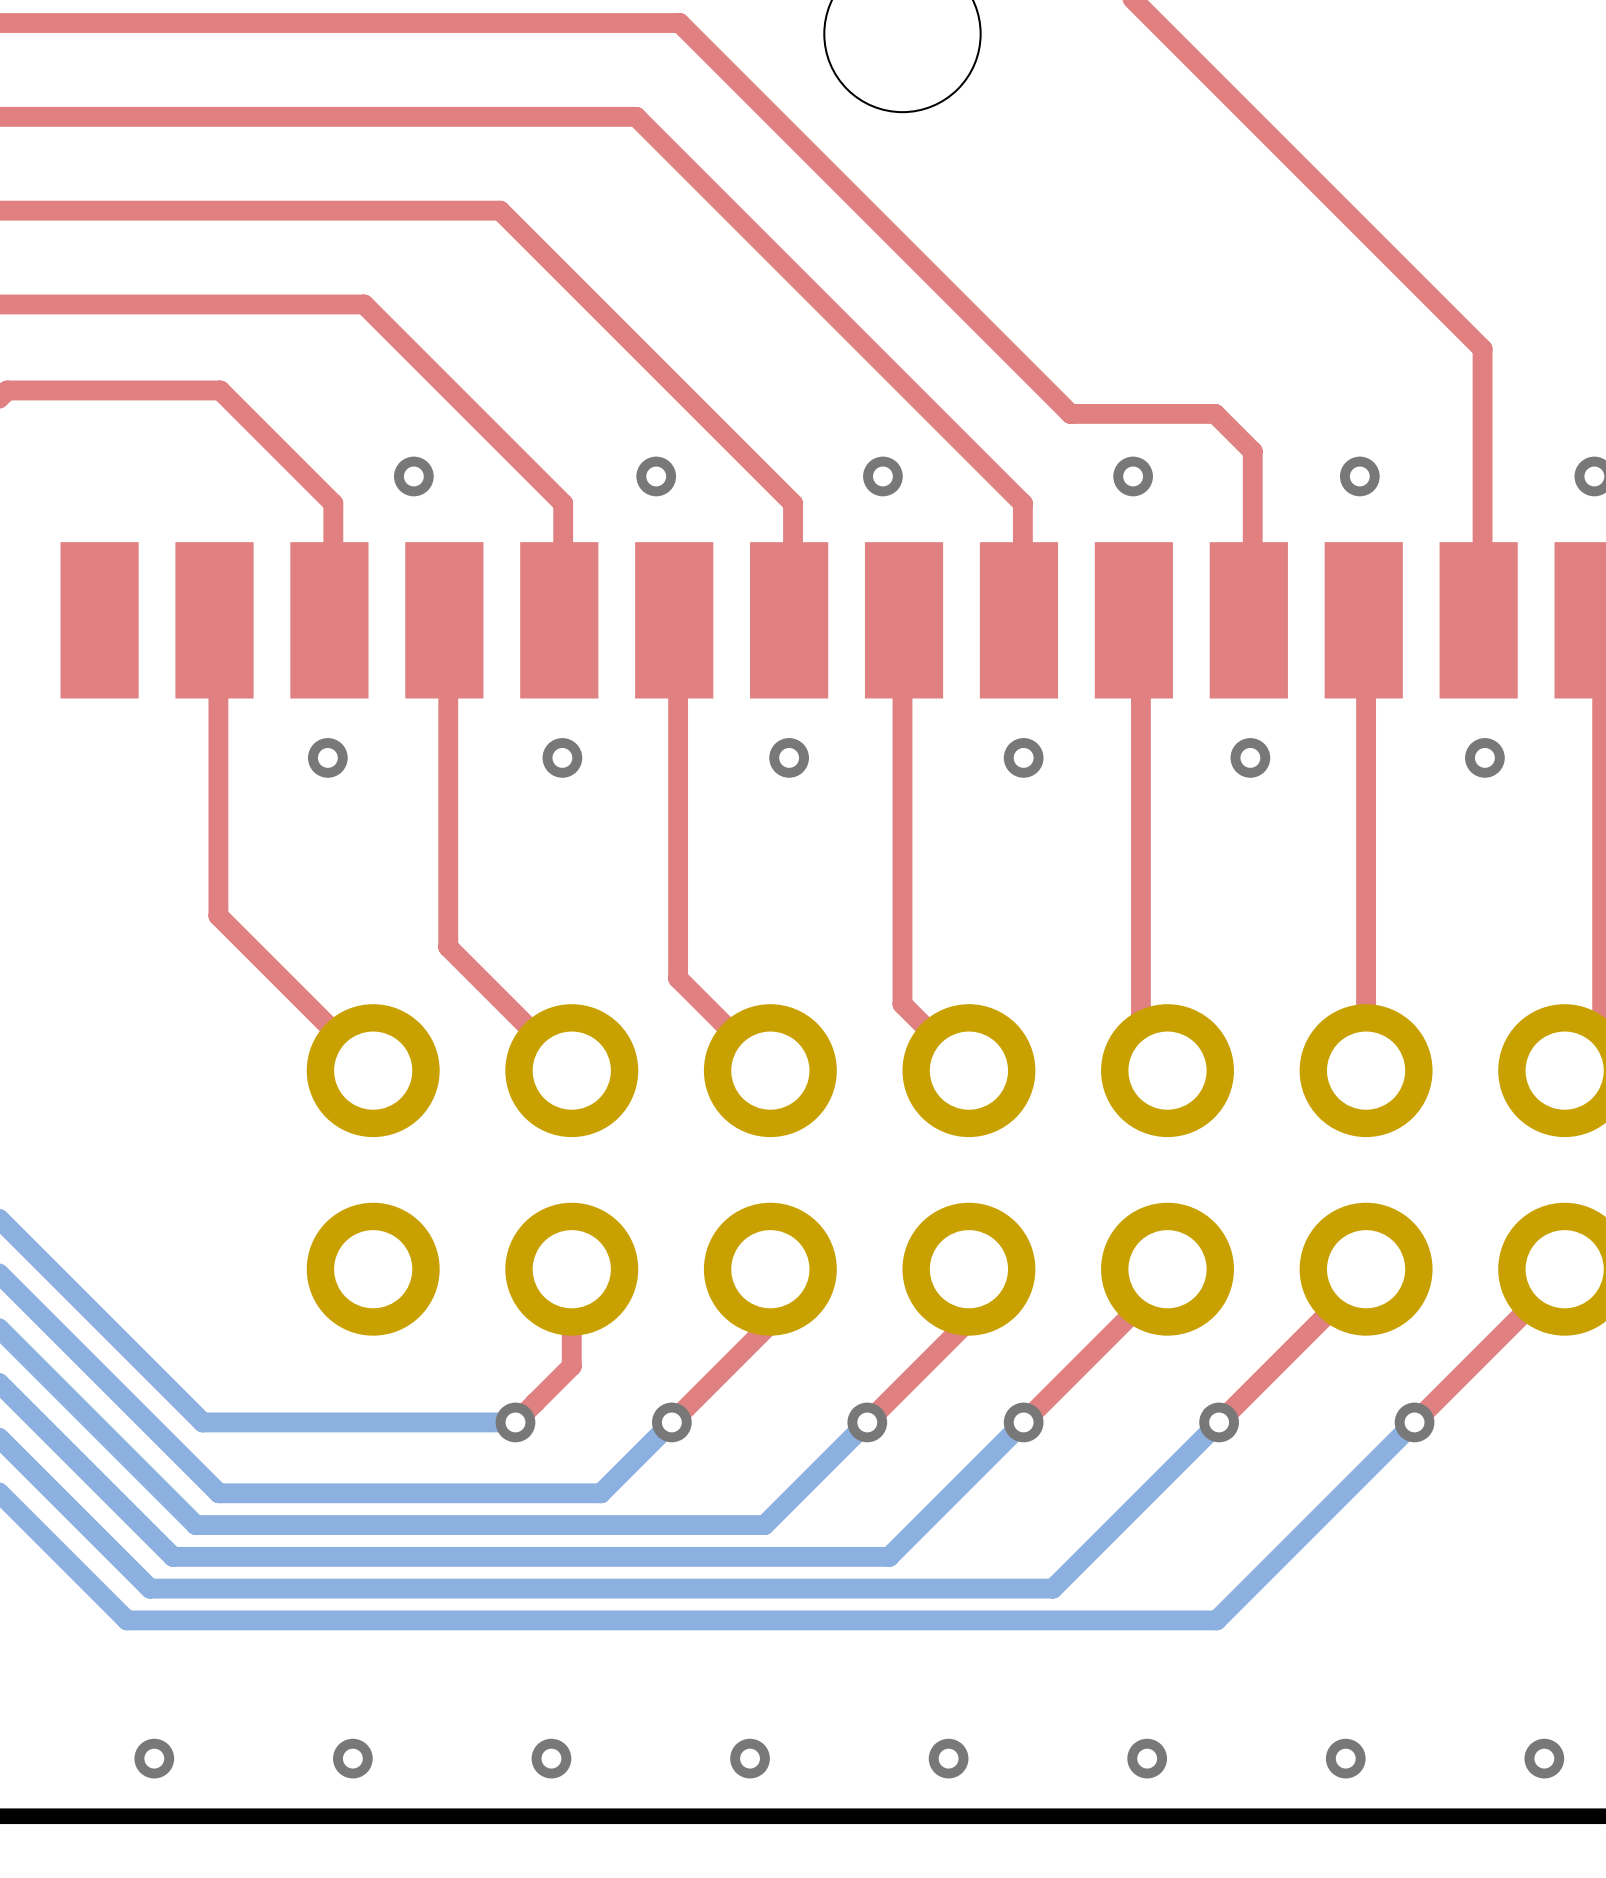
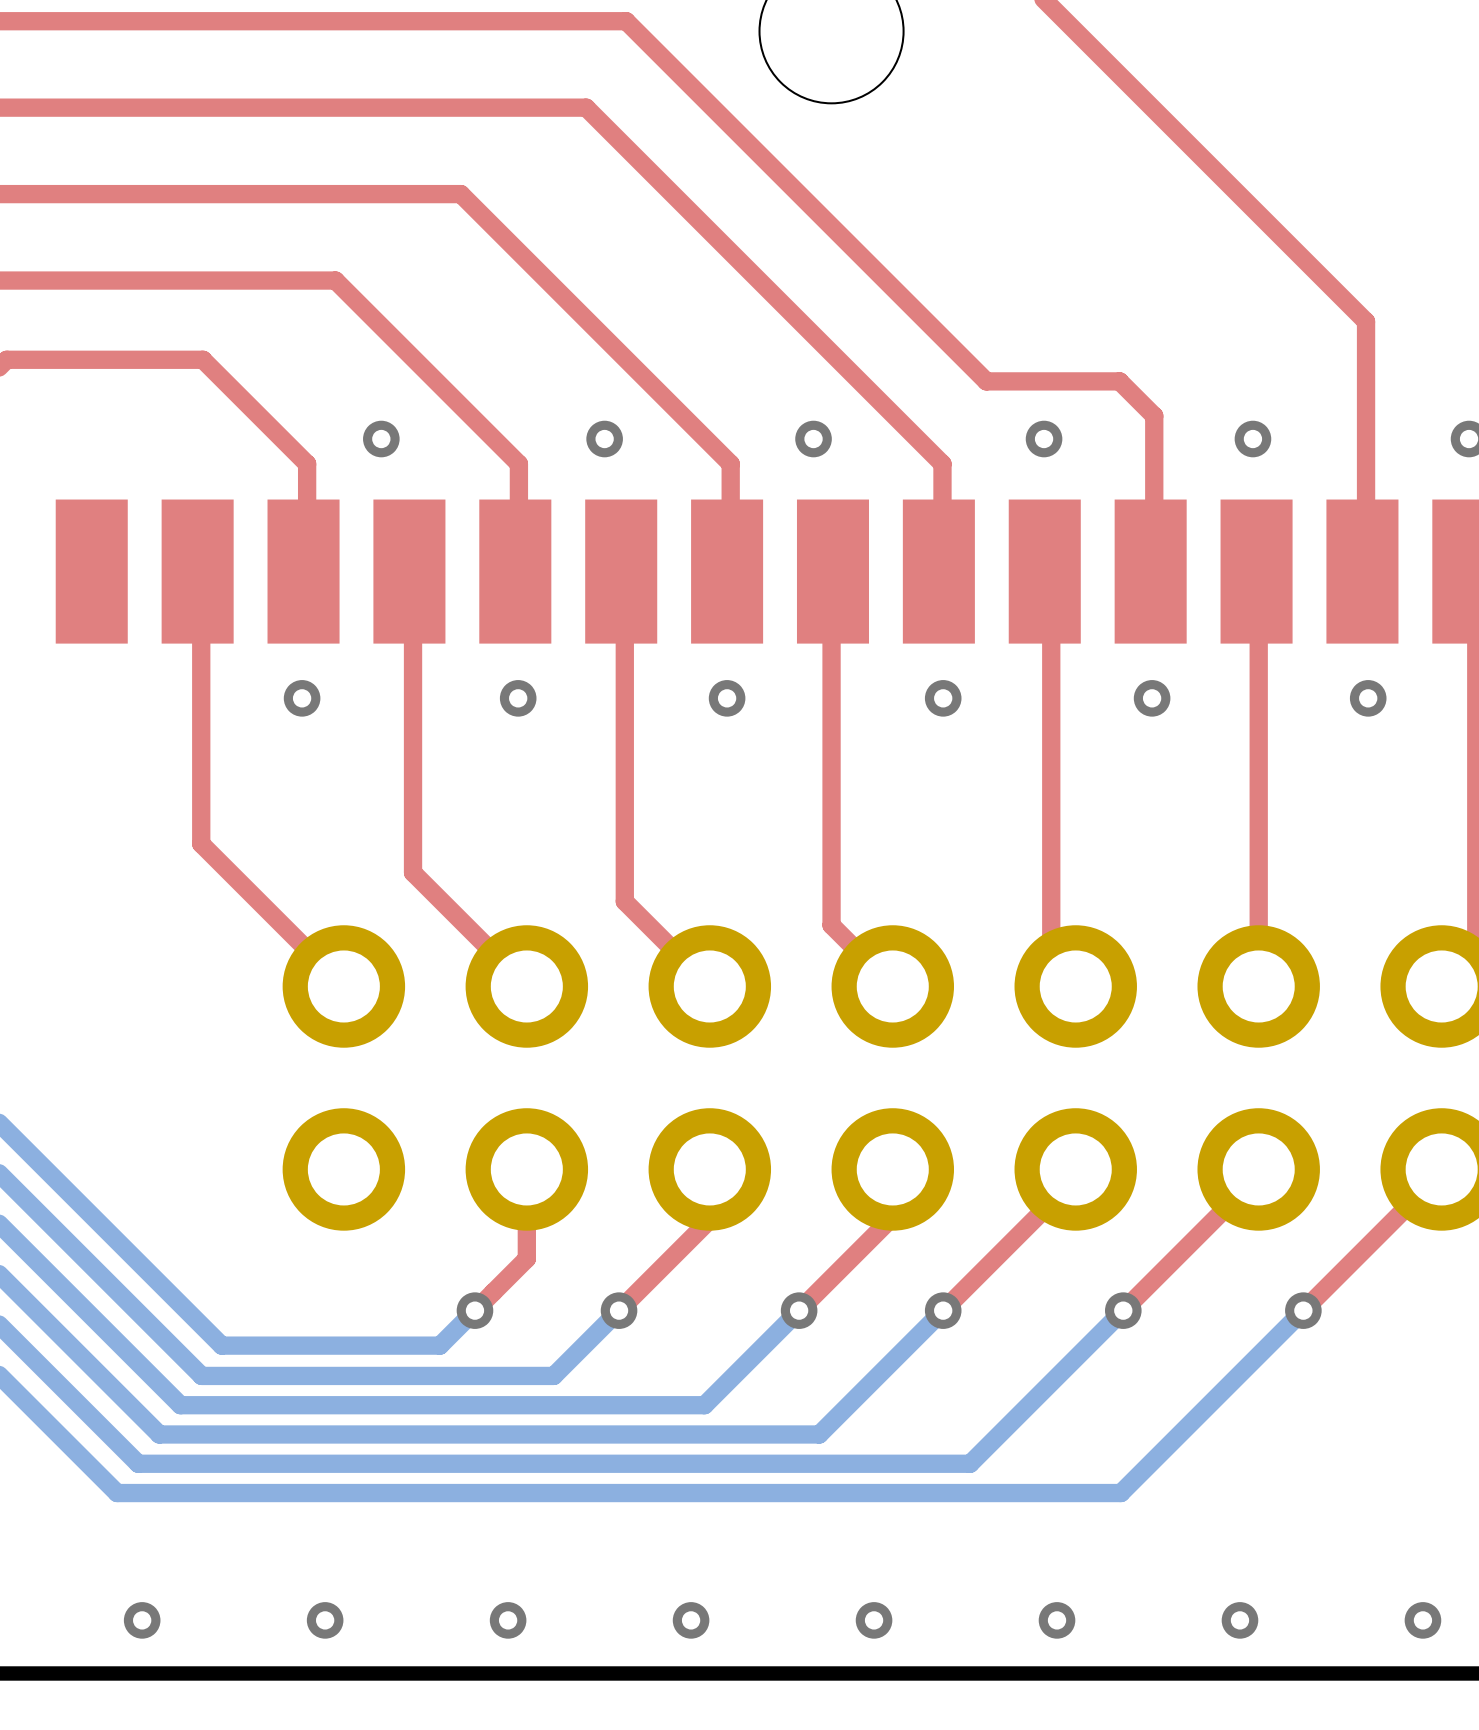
bottom track: (515, 1422) (202, 1422) -> (474, 1310) (439, 1345) (221, 1345) (186, 1310)

